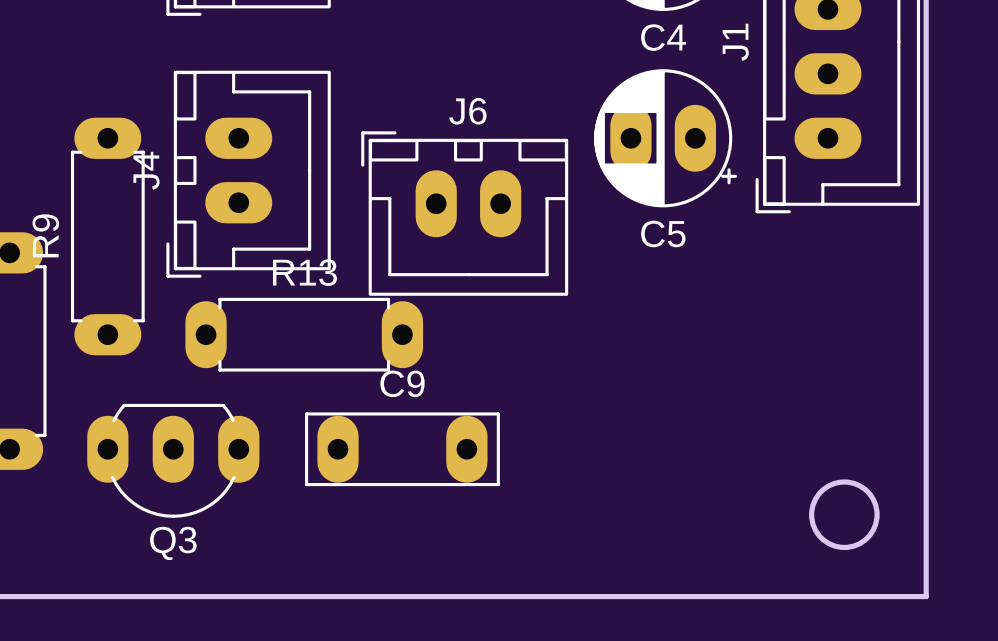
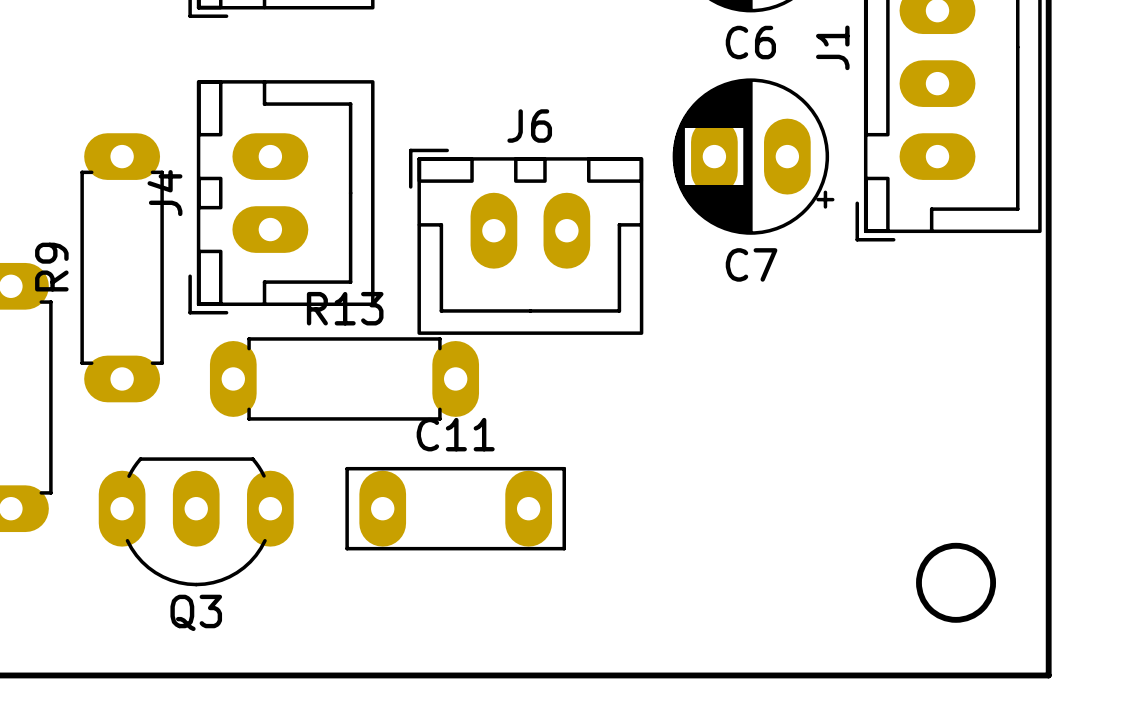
C4 name: C4 (663, 37) -> C6 (750, 42)
C5 name: C5 (663, 233) -> C7 (751, 264)
C9 name: C9 (402, 383) -> C11 (455, 434)

